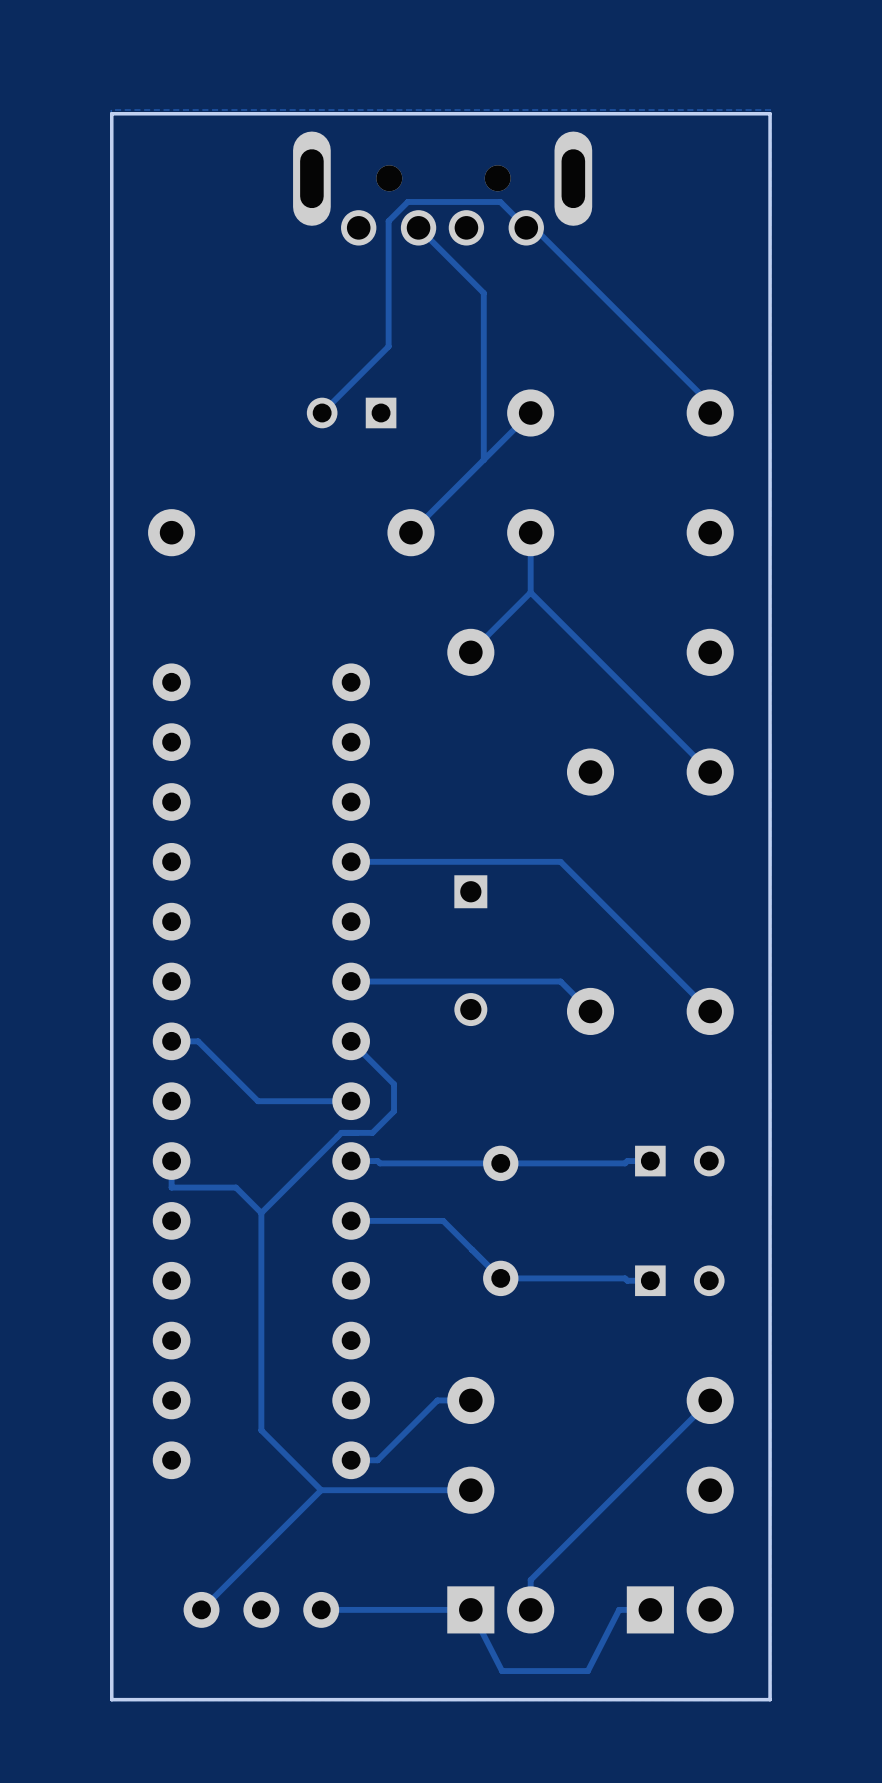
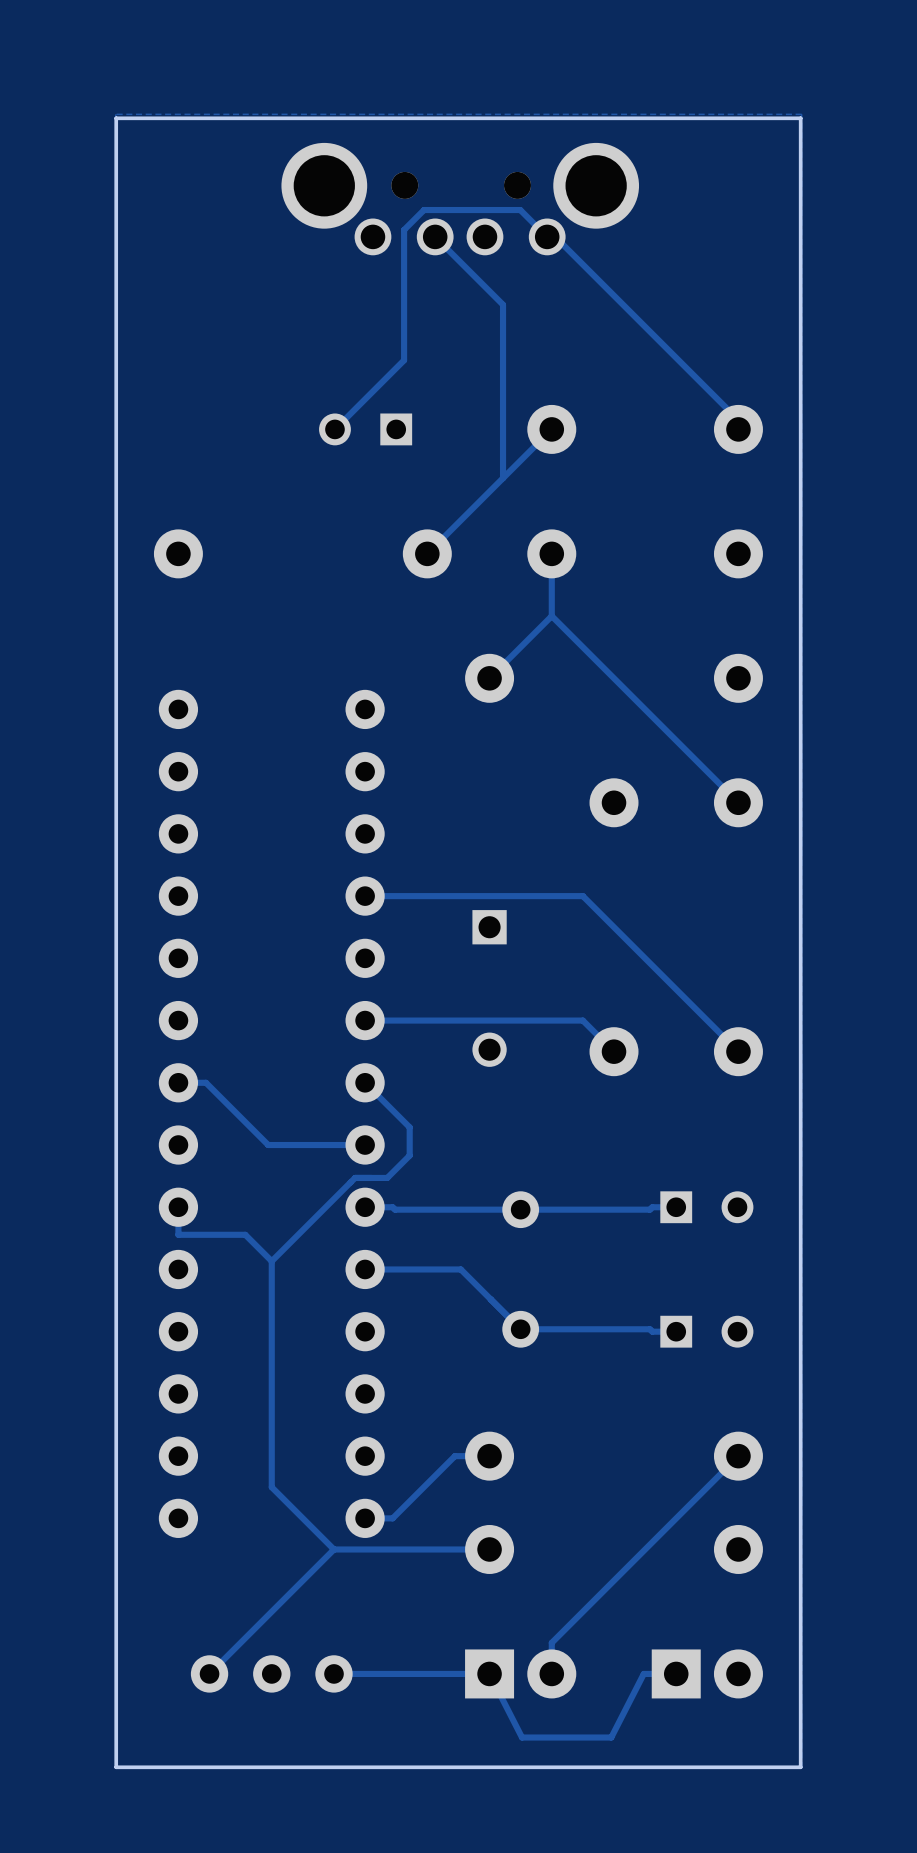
part footprint: [293, 131, 593, 246] -> [281, 142, 640, 256]

